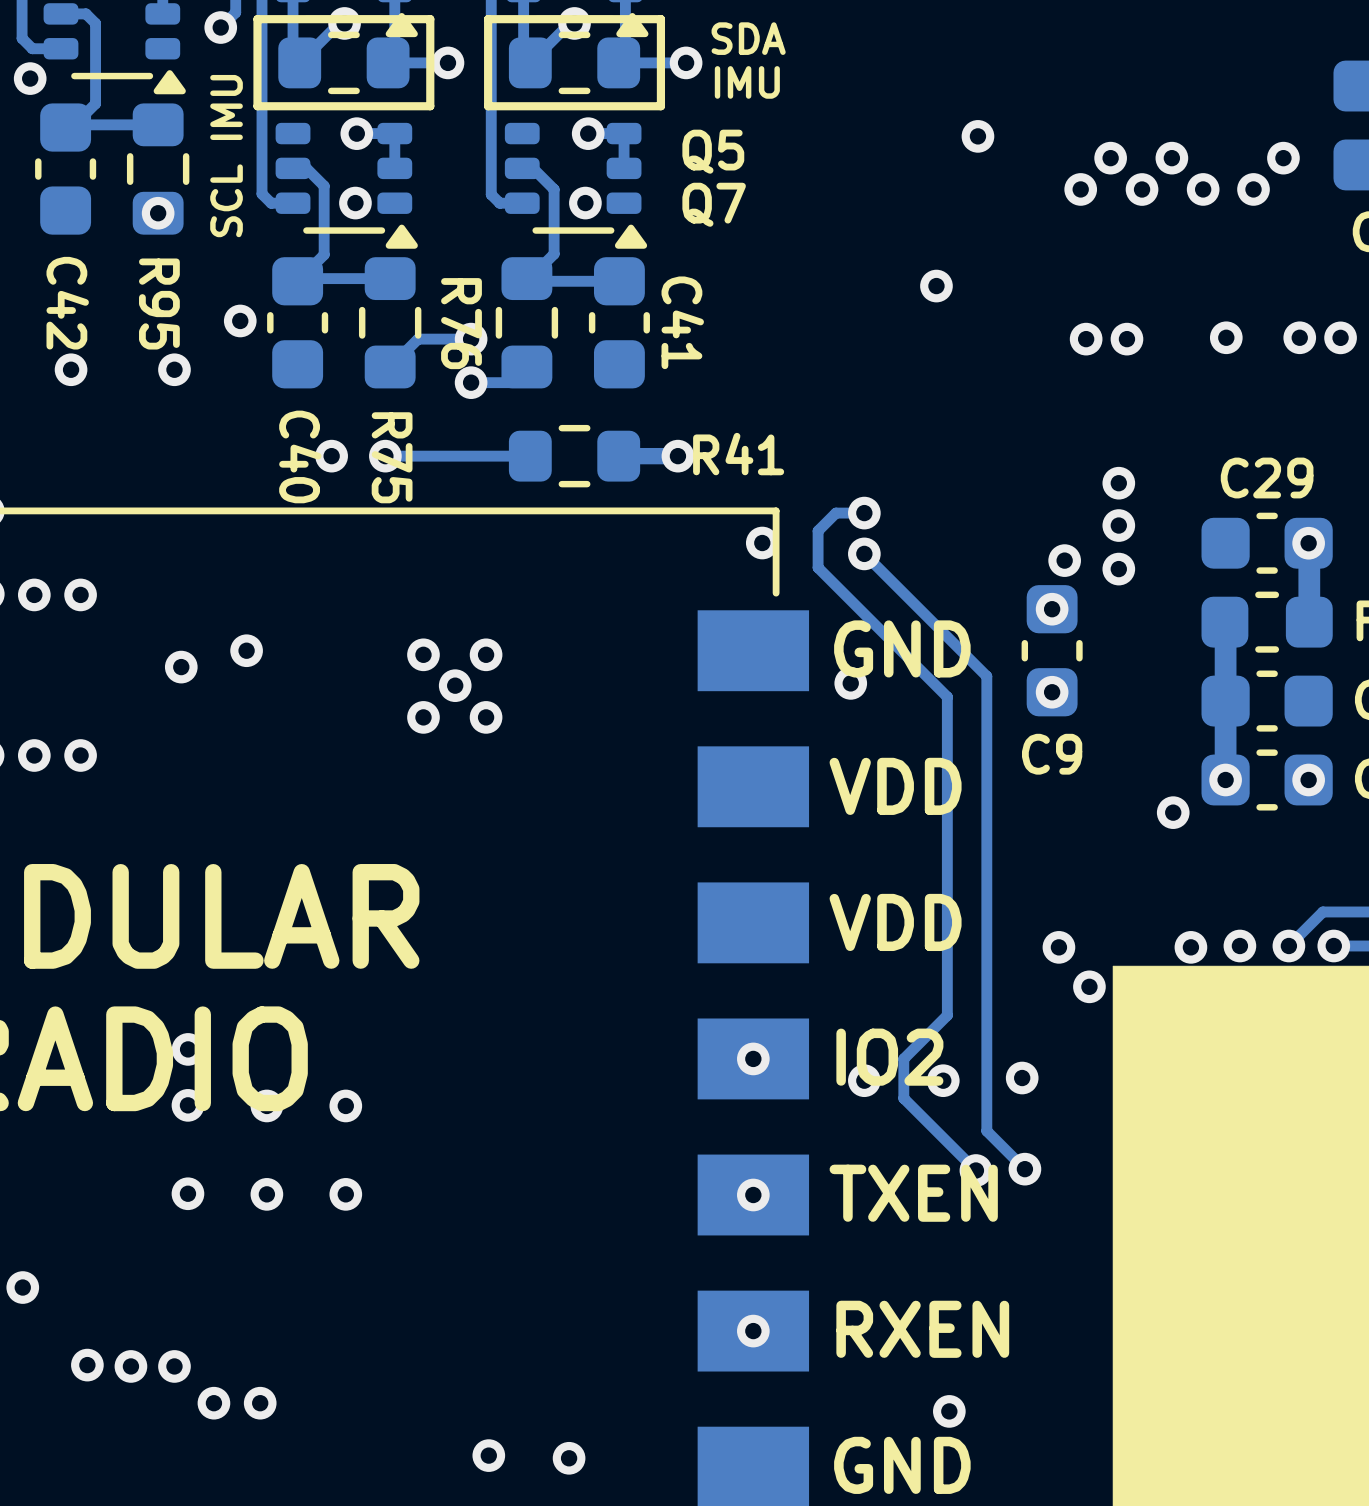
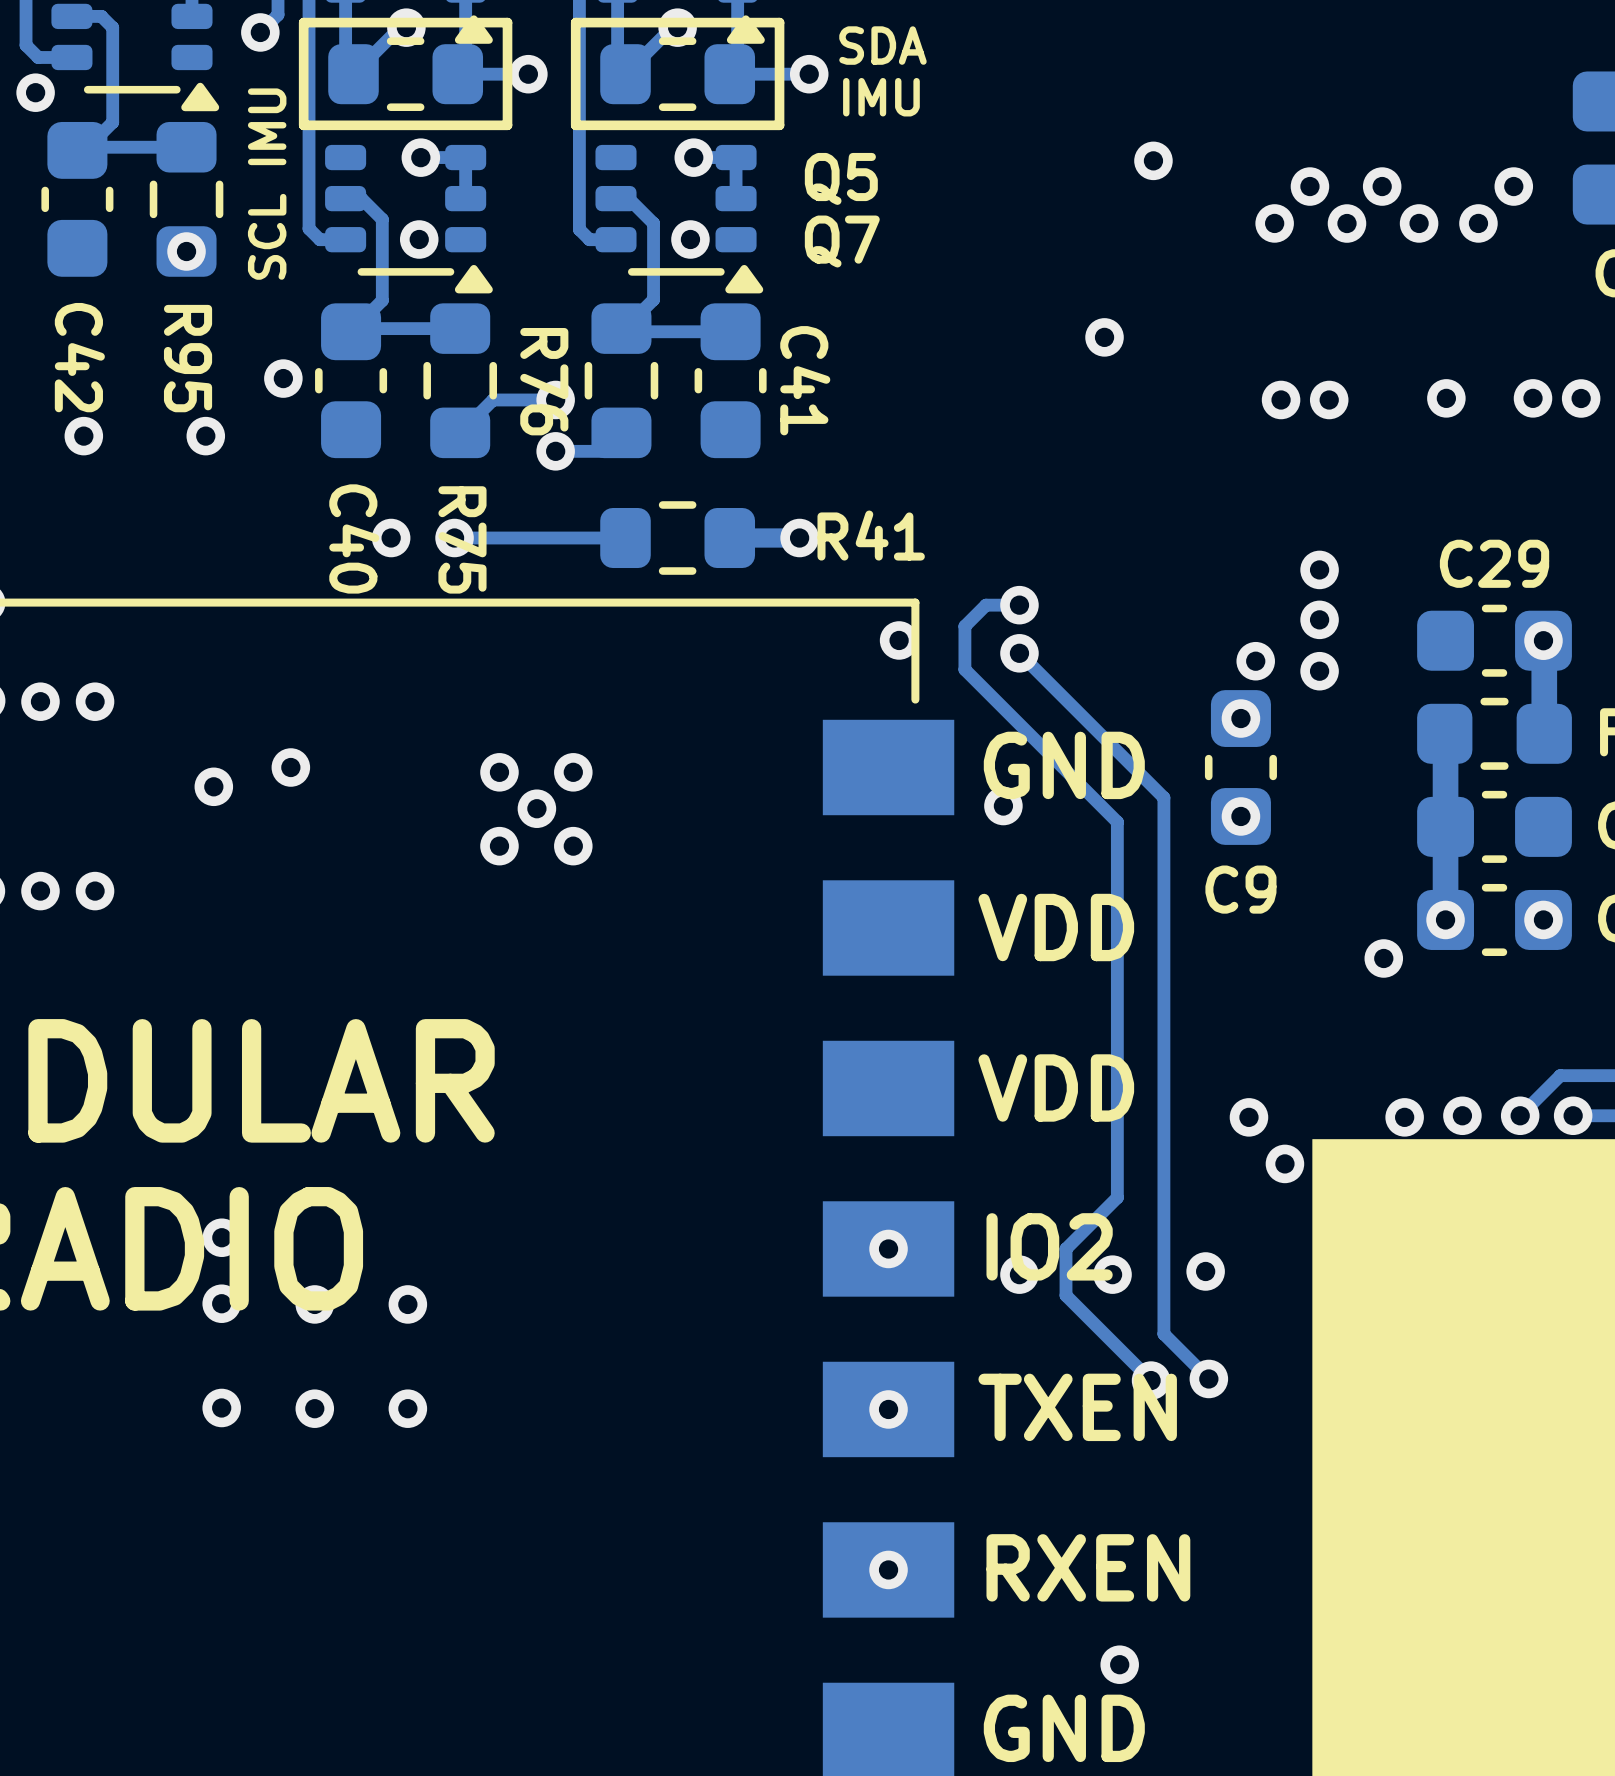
via: (22, 1287) -> none
via: (87, 1365) -> none
via: (130, 1366) -> none
via: (174, 1366) -> none
via: (213, 1403) -> none
via: (260, 1403) -> none
via: (488, 1455) -> none
via: (569, 1458) -> none

